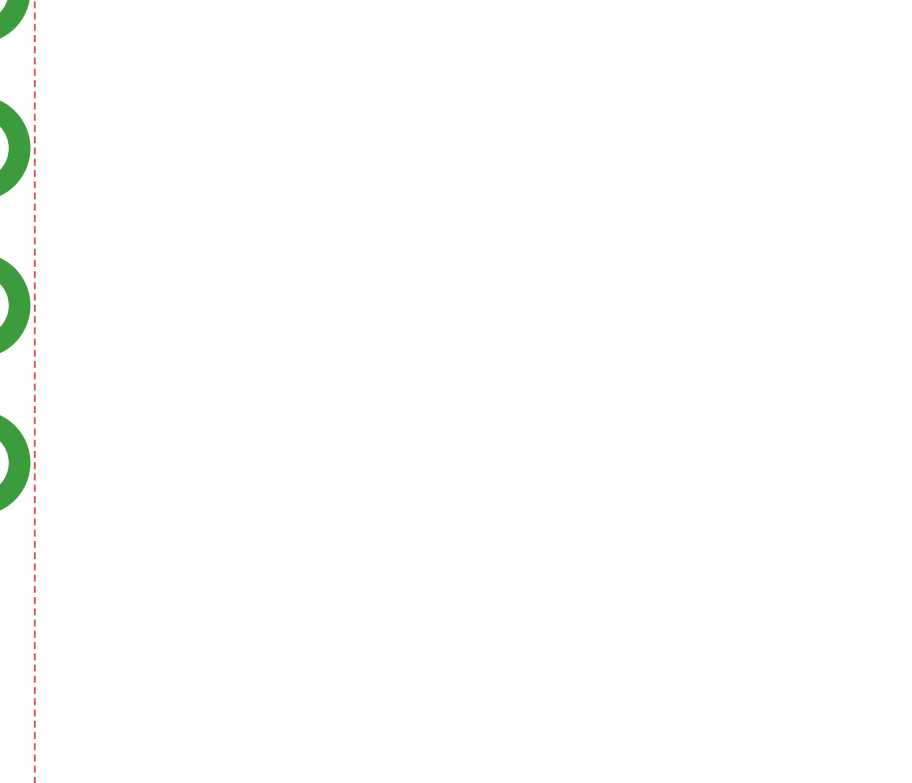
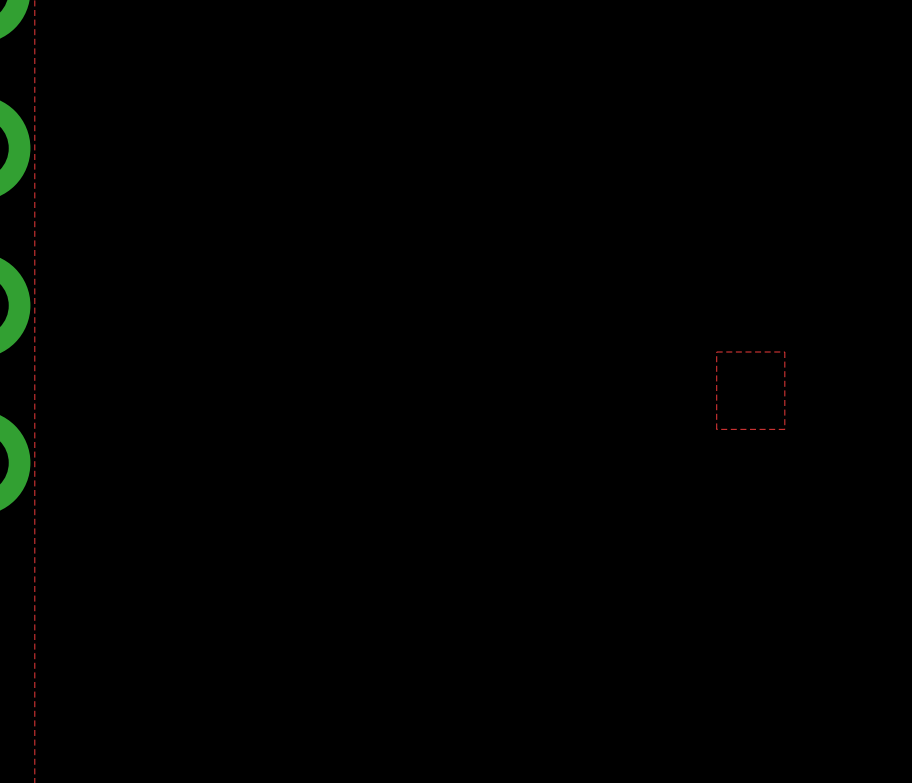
zone outline: none -> (716, 351) (716, 429) (784, 429) (784, 351) (716, 351)

